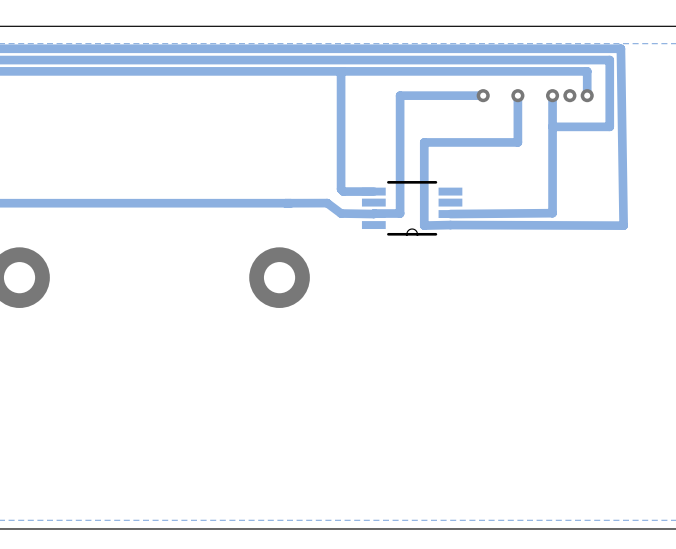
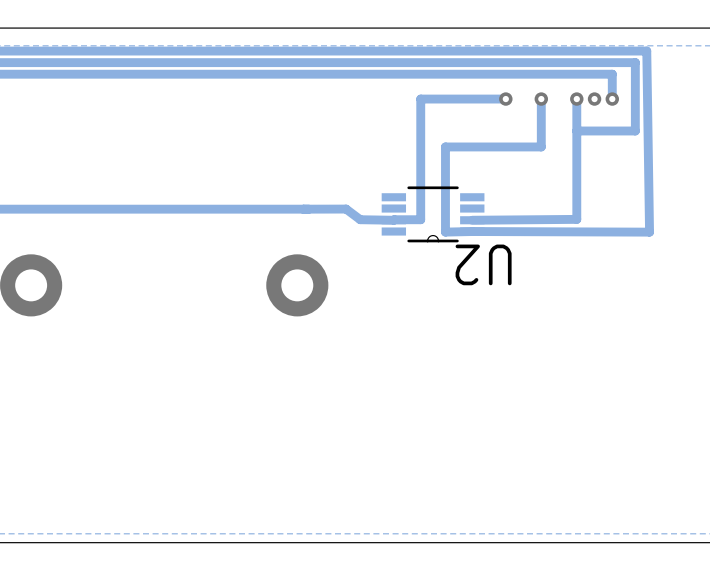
track: (342, 71) (341, 73) (341, 189) (343, 191) (373, 191) -> none
U2 name: none -> U2 (483, 264)

